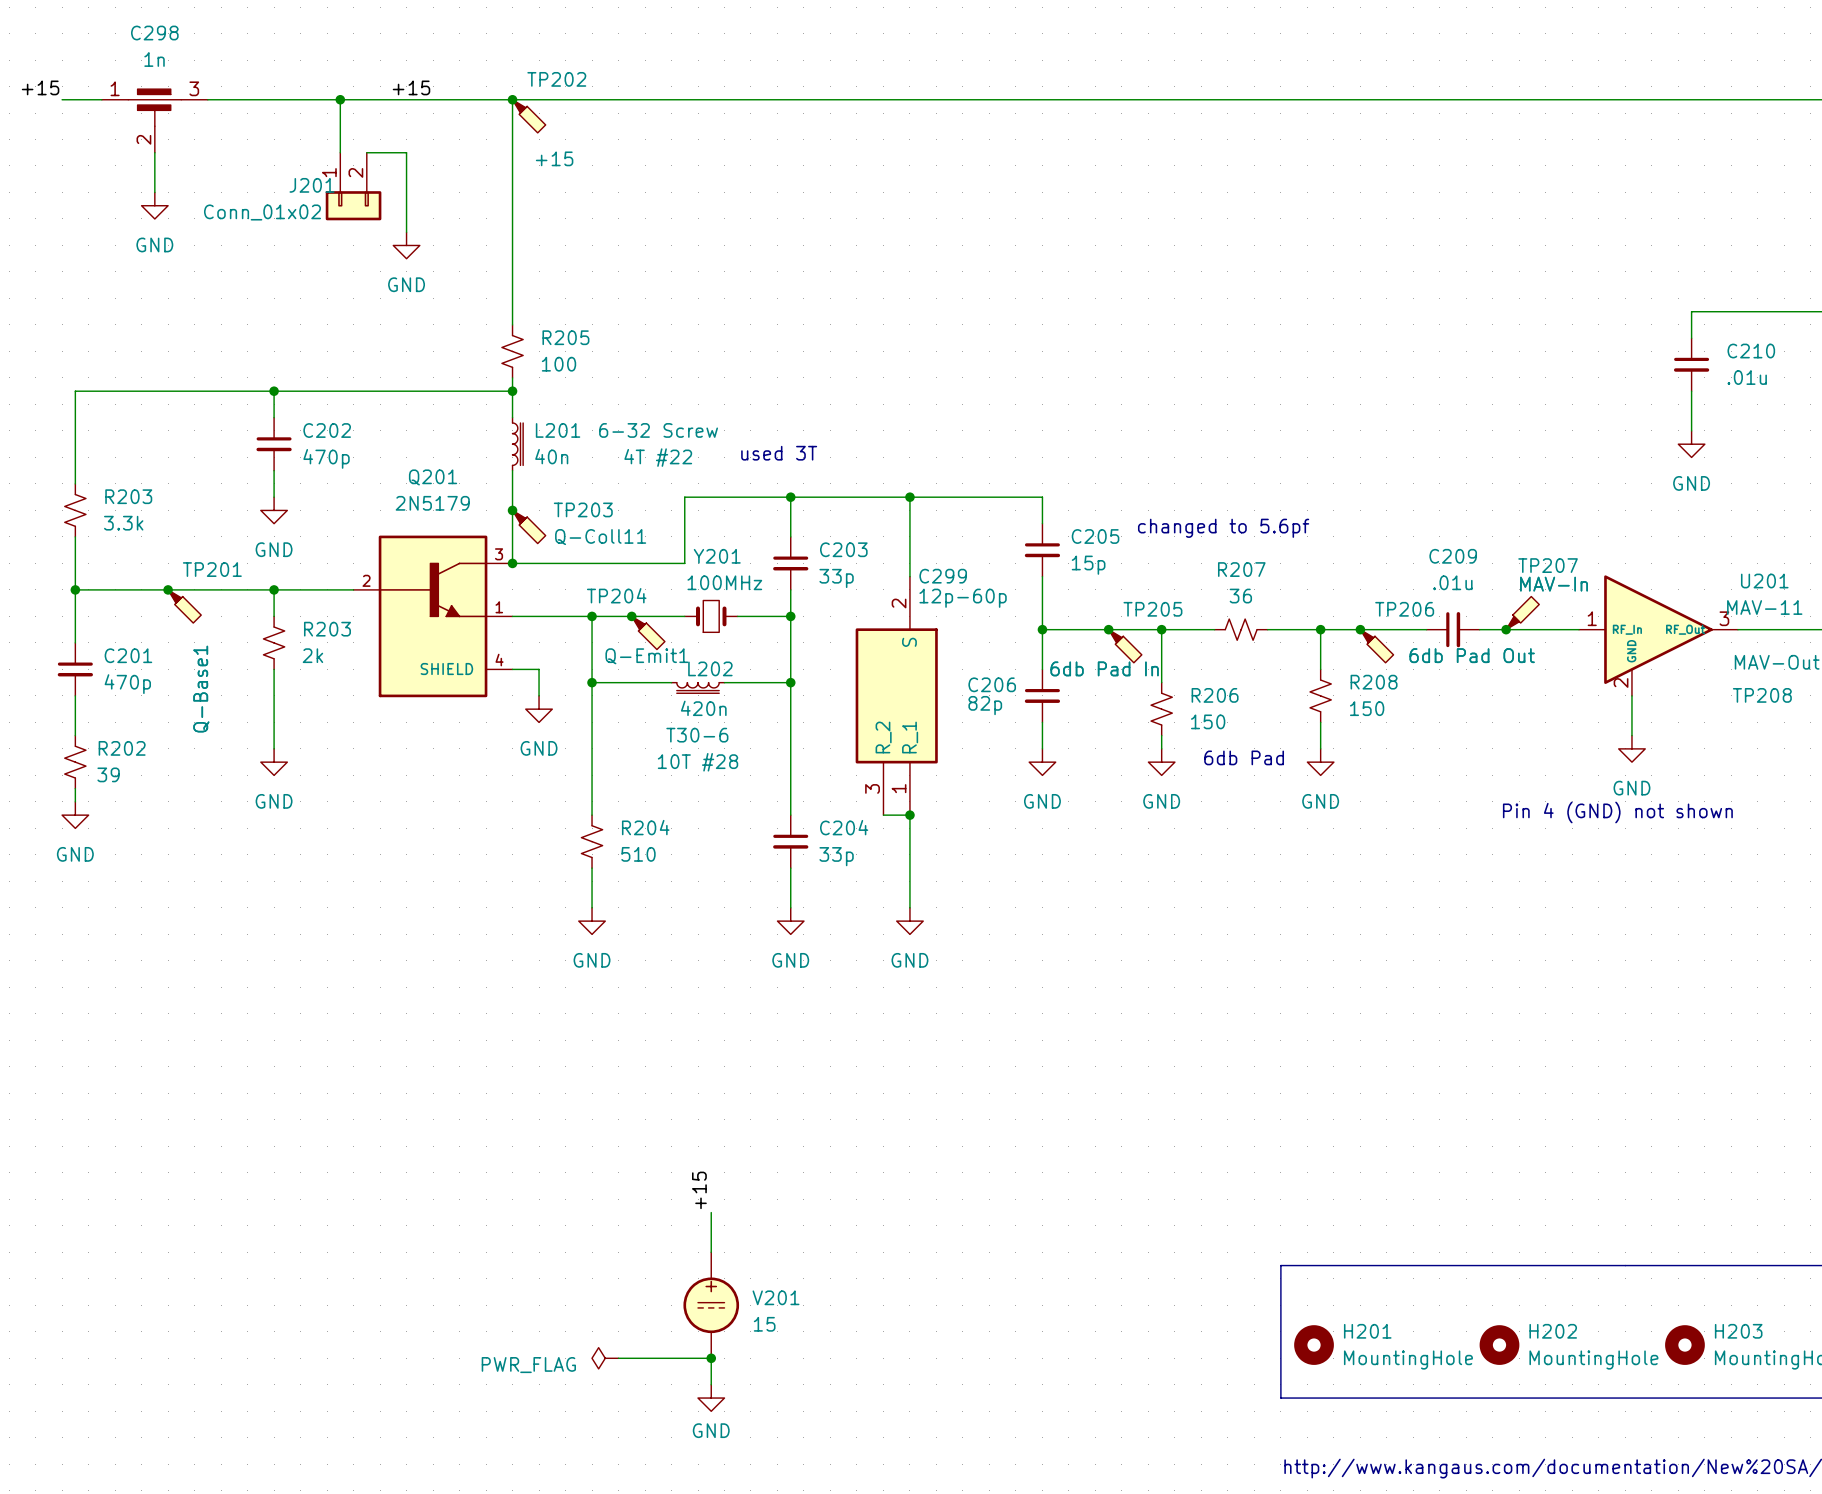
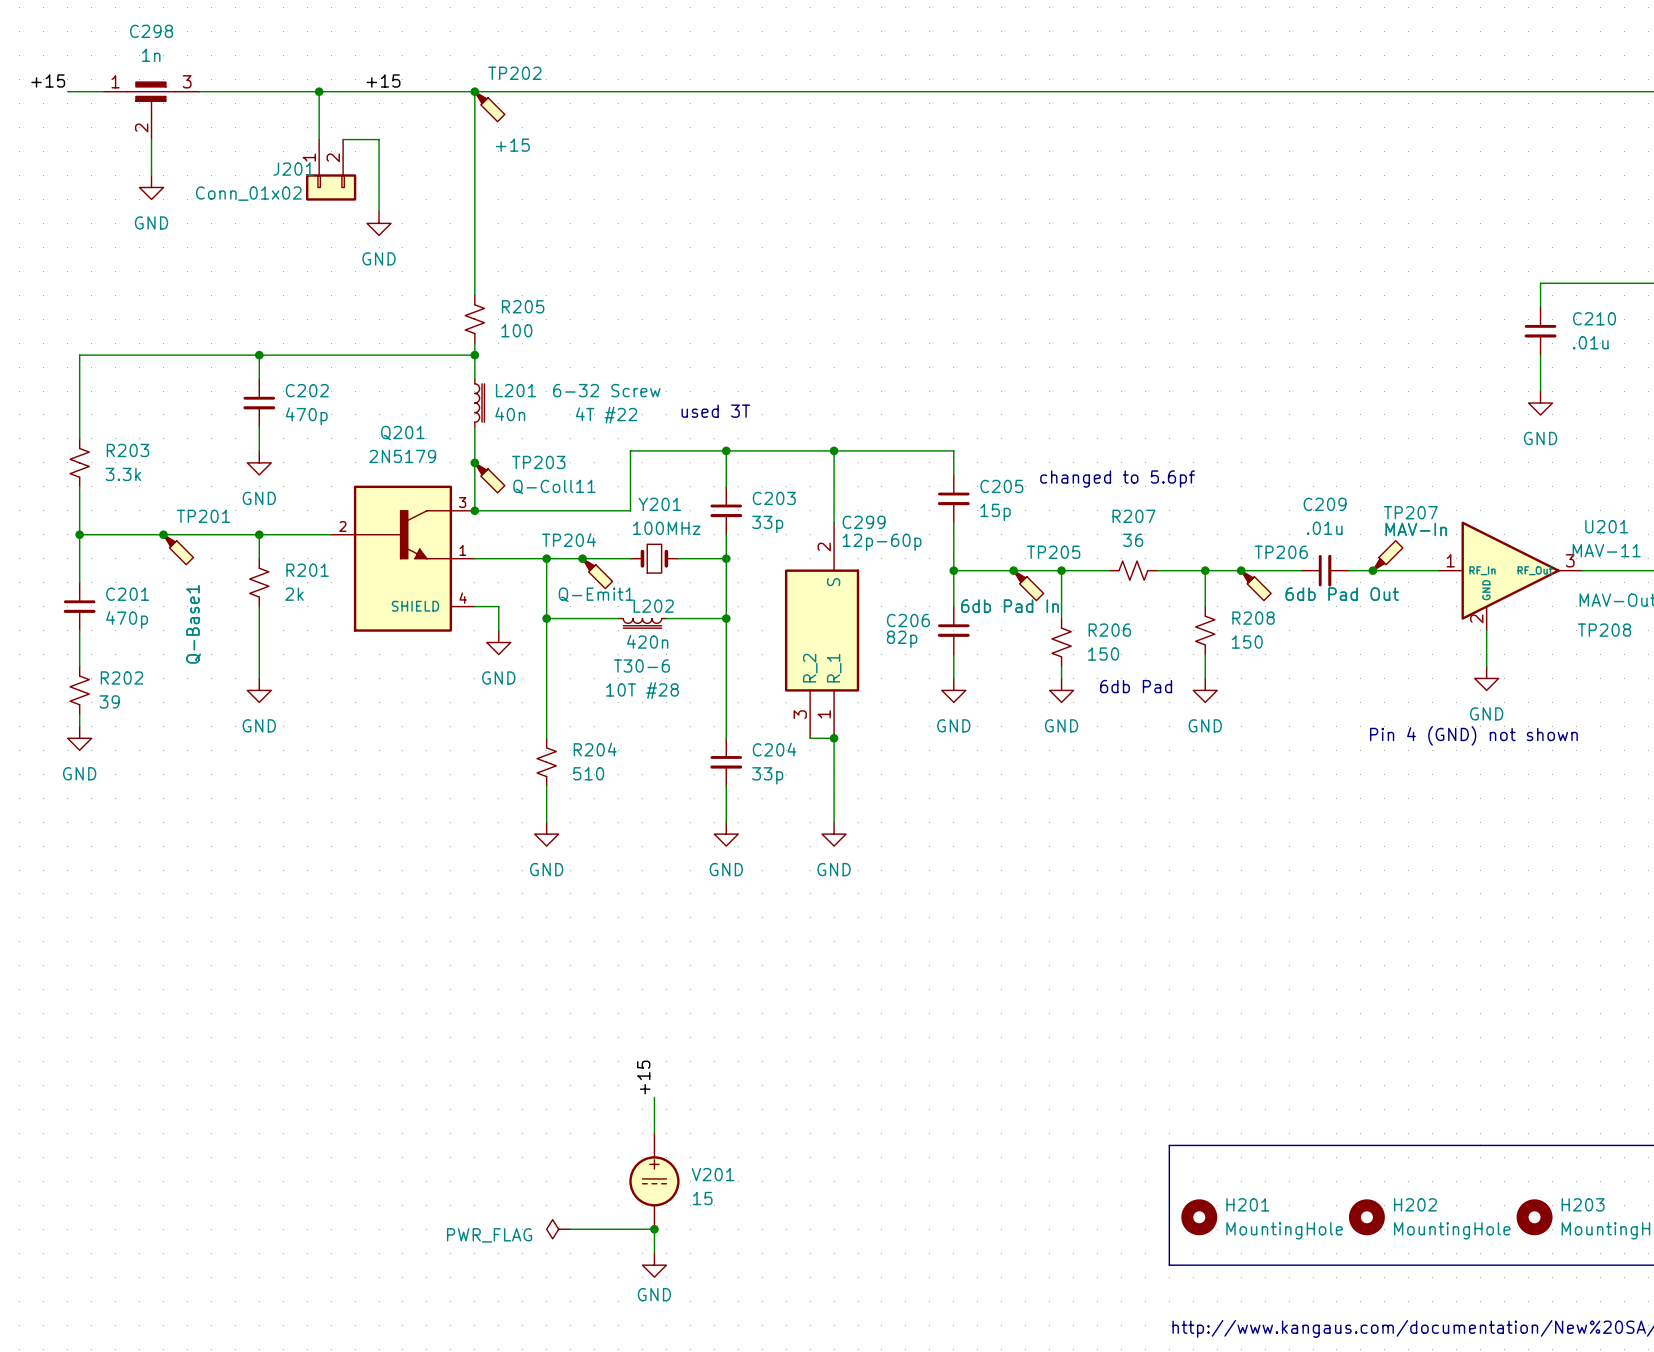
R203 name: R203 (327, 629) -> R201 (307, 570)

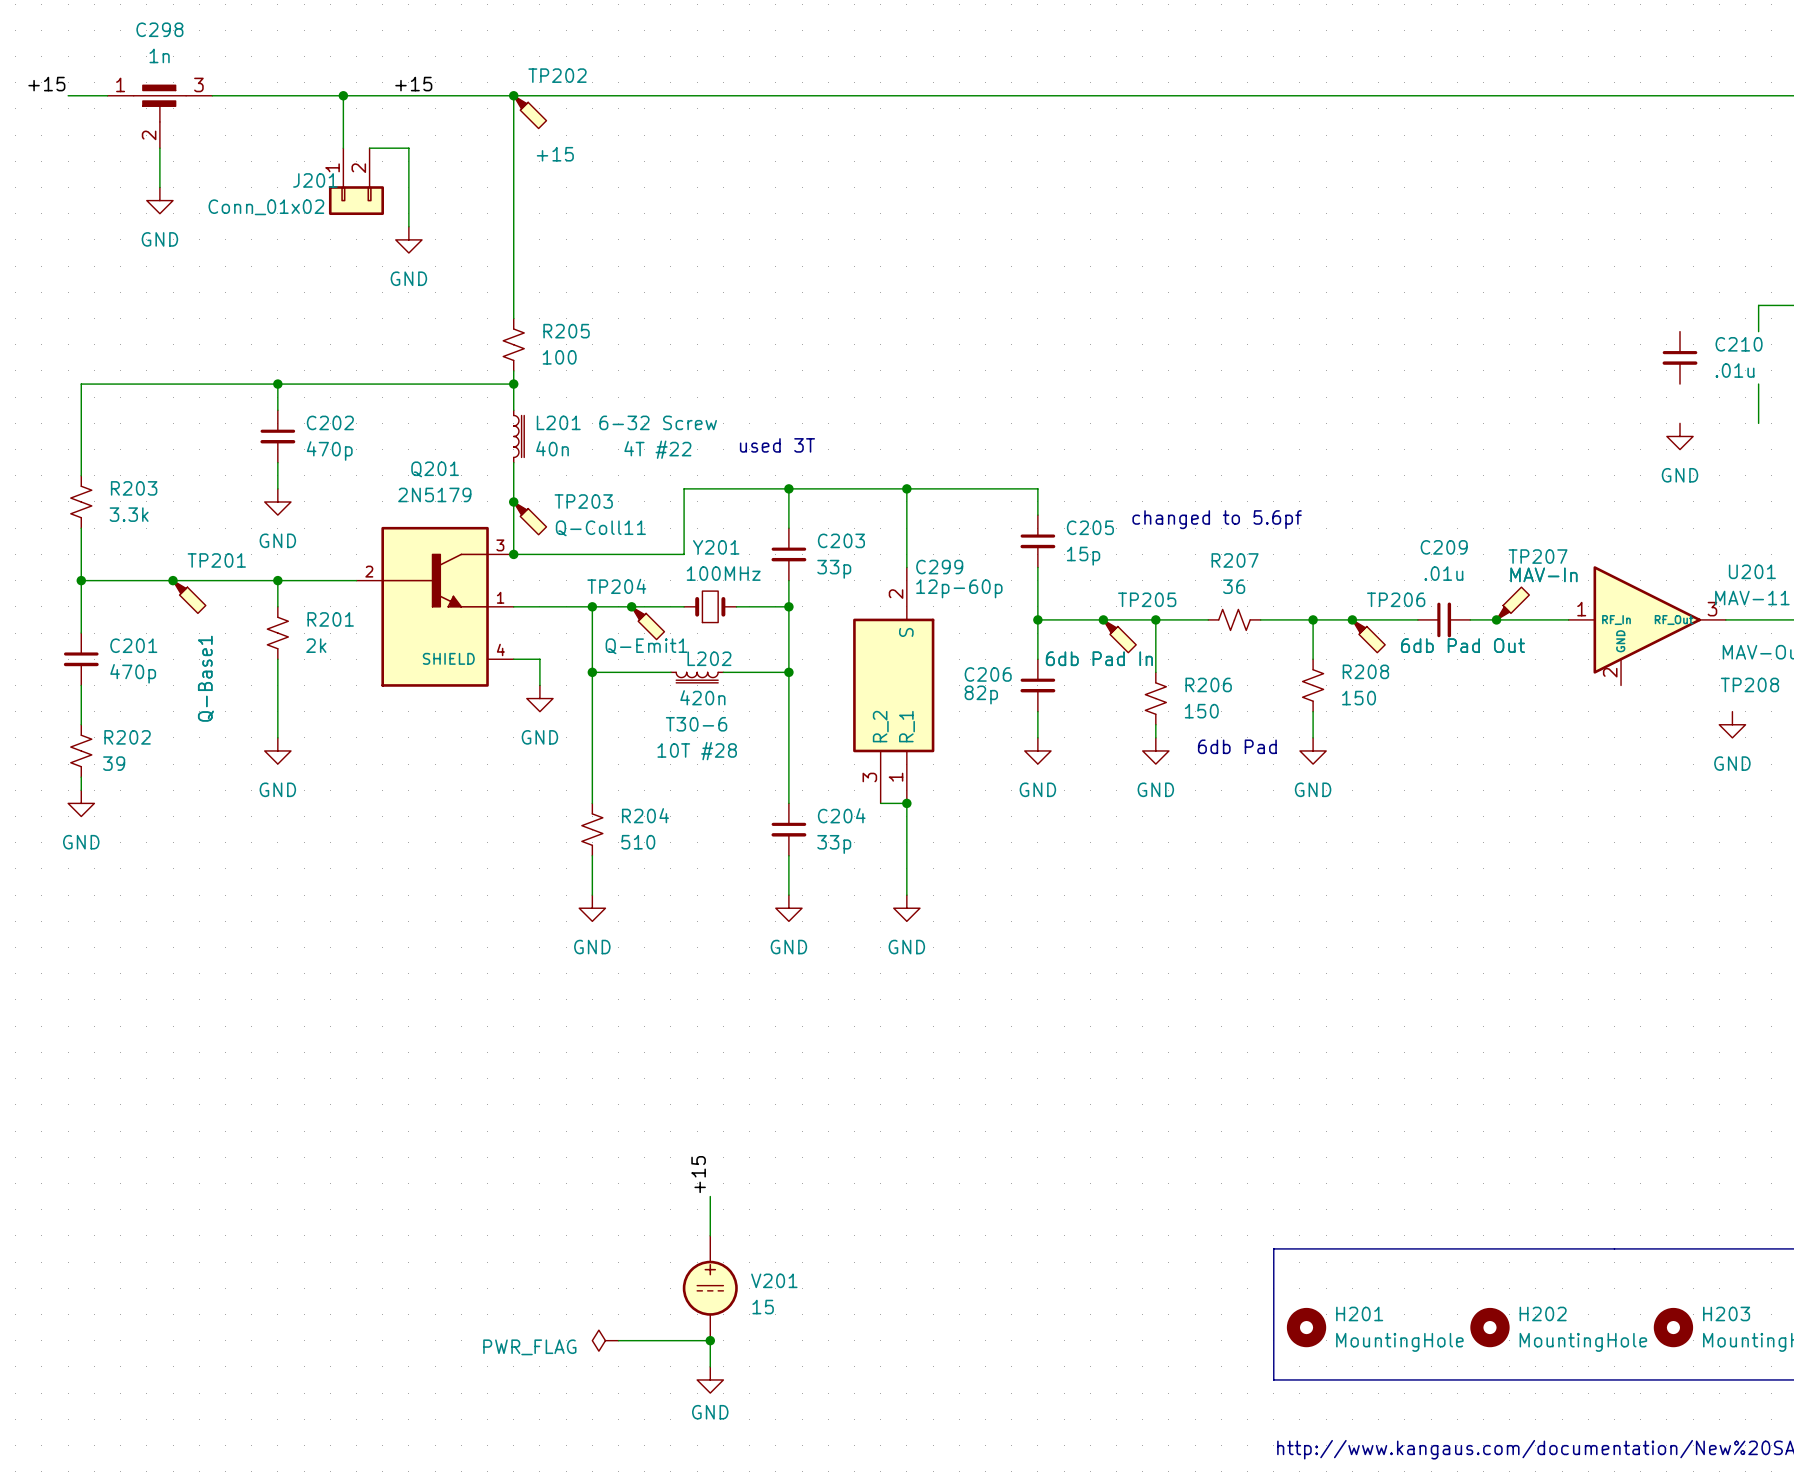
wire: (1612, 283) (1540, 283) (1540, 307) -> (1758, 305) (1758, 331)
wire: (1540, 355) (1540, 391) -> (1758, 384) (1758, 423)
wire: (1486, 630) (1486, 666) -> none
power symbol position: GND (1486, 678) -> GND (1732, 724)
text: Pin 4 (GND) not shown (1473, 735) -> none

